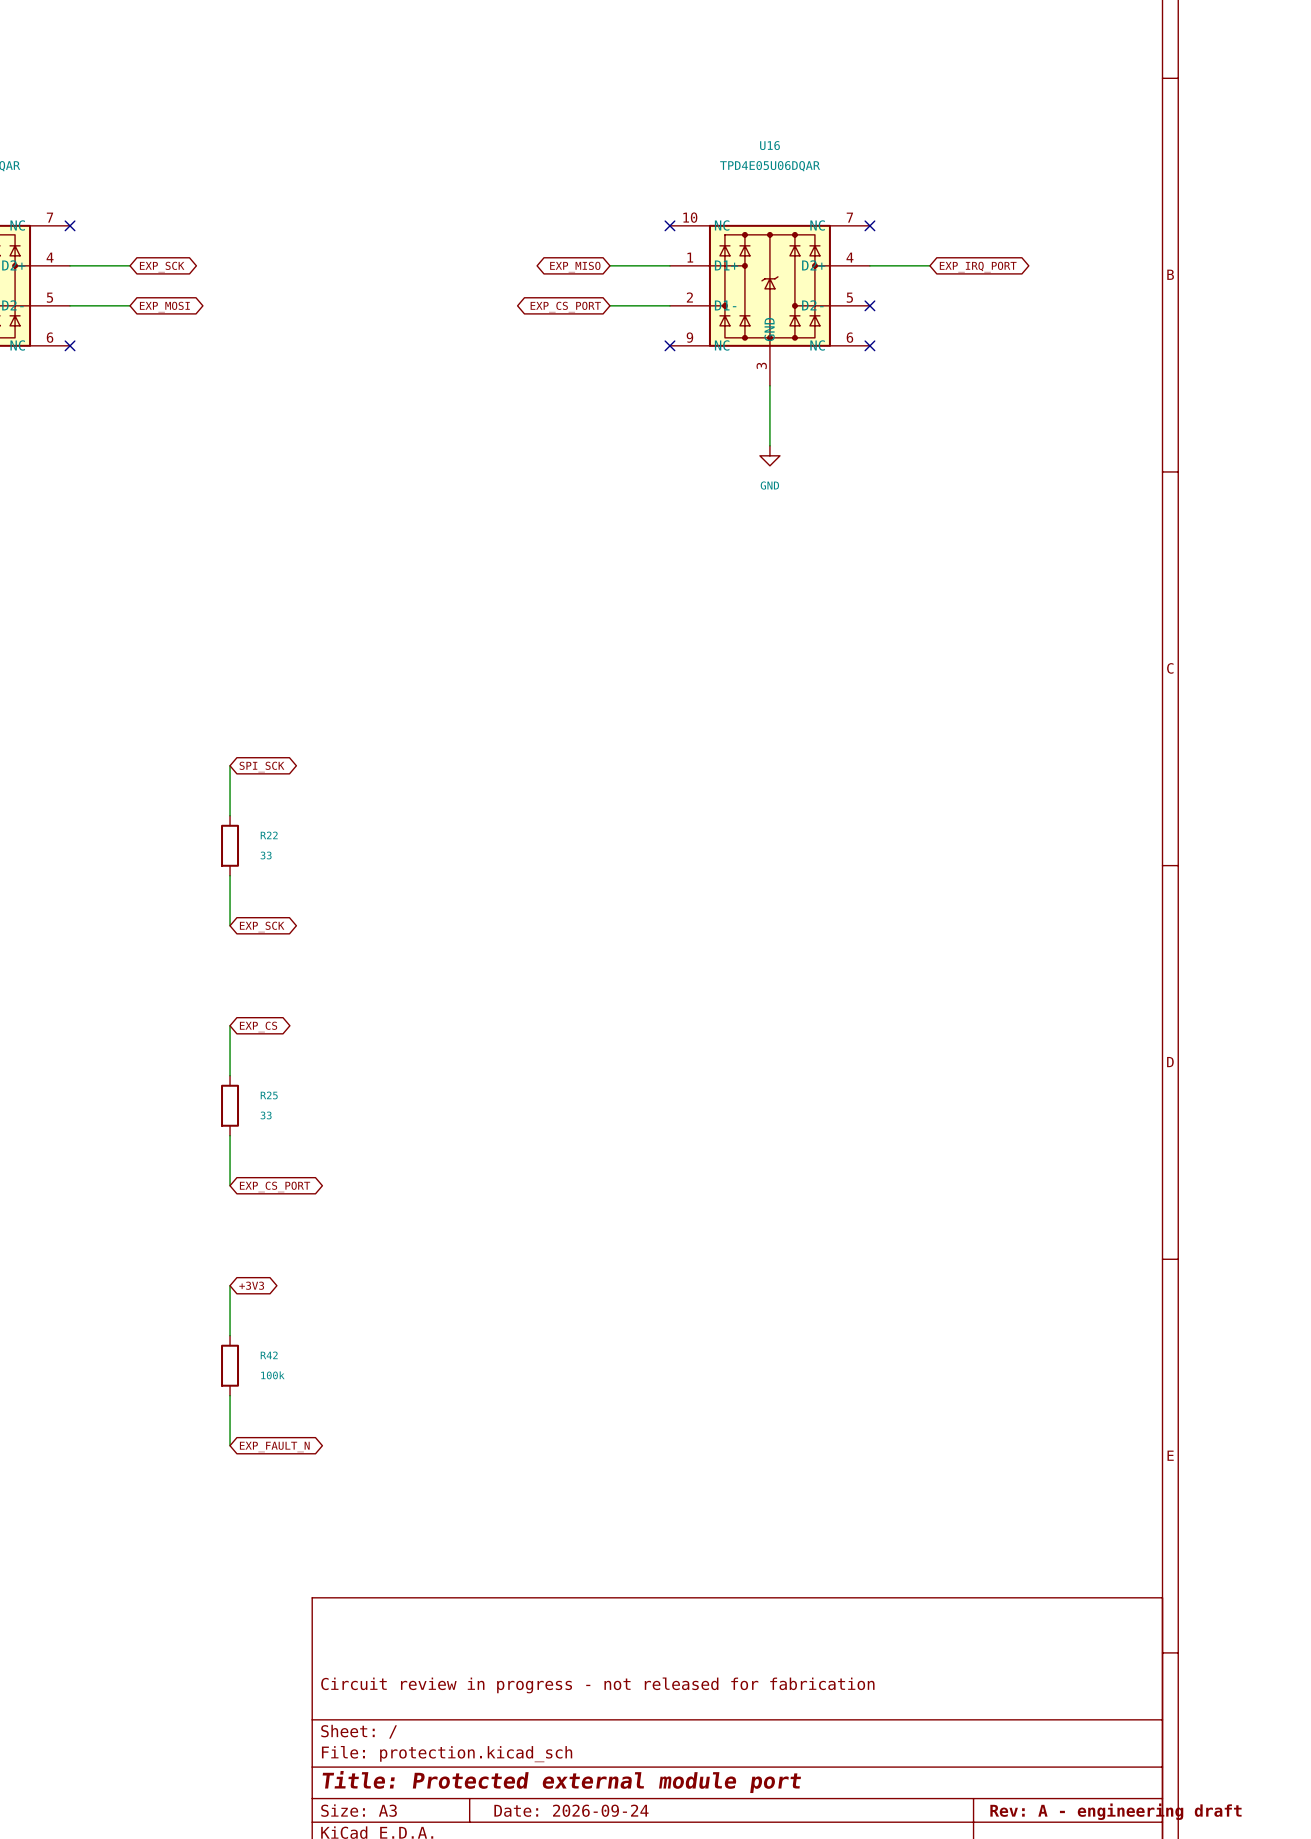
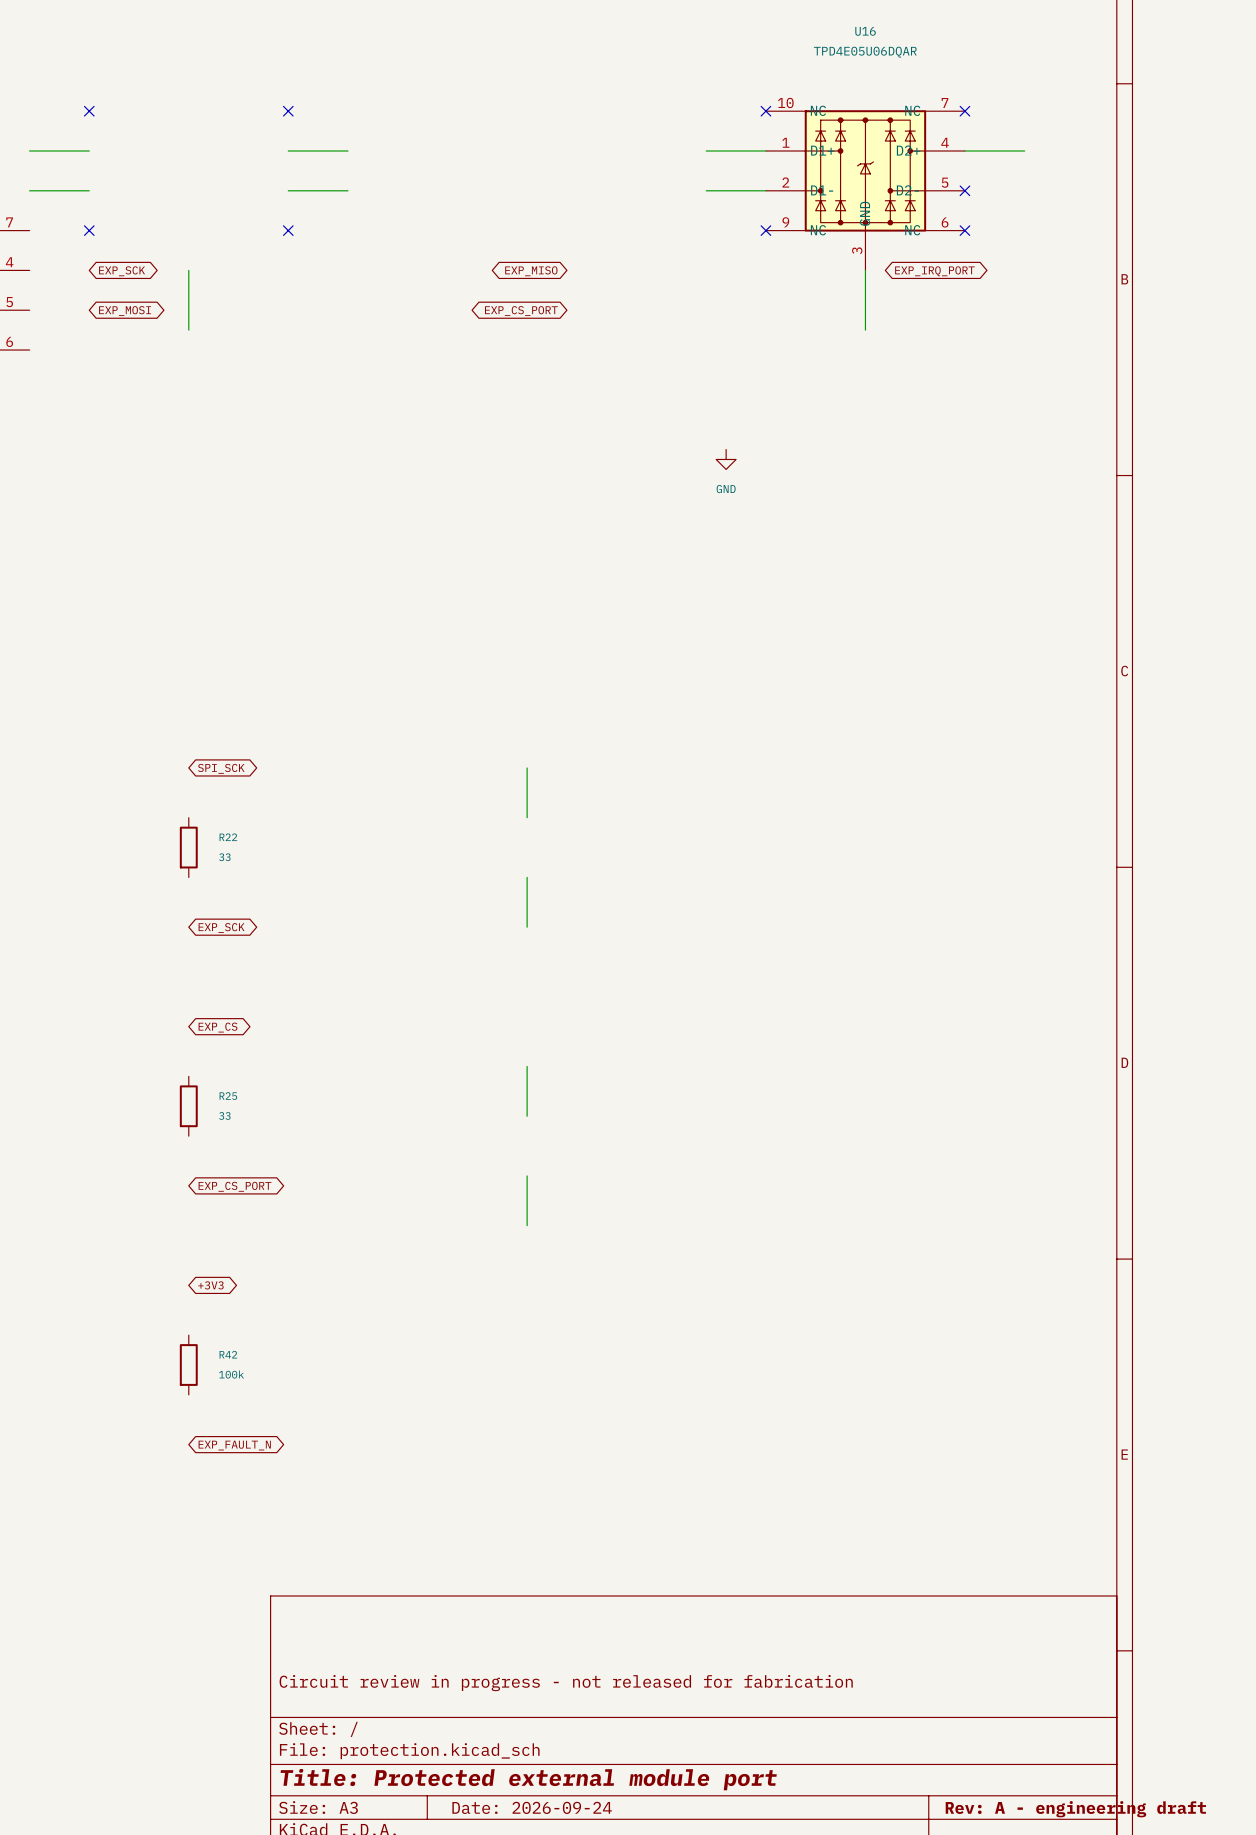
no-connect mark: none -> (89, 111)
no-connect mark: none -> (288, 111)
no-connect mark: none -> (765, 111)
no-connect mark: none -> (964, 111)
wire: none -> (288, 151) (348, 151)
wire: none -> (288, 190) (348, 190)
no-connect mark: none -> (964, 190)
no-connect mark: (70, 225) -> none
no-connect mark: none -> (89, 230)
no-connect mark: none -> (288, 230)
no-connect mark: (669, 225) -> none
no-connect mark: none -> (765, 230)
no-connect mark: (869, 225) -> none
no-connect mark: none -> (964, 230)
wire: (70, 265) (130, 265) -> (29, 151) (89, 151)
wire: none -> (188, 270) (188, 330)
wire: (609, 265) (669, 265) -> (706, 151) (765, 151)
wire: (869, 265) (929, 265) -> (964, 151) (1024, 151)
wire: (70, 305) (130, 305) -> (29, 190) (89, 190)
wire: (609, 305) (669, 305) -> (706, 190) (765, 190)
U16 position: (769, 305) -> (865, 190)
no-connect mark: (869, 305) -> none
no-connect mark: (70, 345) -> none
no-connect mark: (669, 345) -> none
no-connect mark: (869, 345) -> none
wire: (769, 385) (769, 445) -> (865, 270) (865, 330)
wire: (230, 765) (230, 815) -> none
wire: none -> (527, 767) (527, 817)
wire: (230, 875) (230, 925) -> none
wire: none -> (527, 877) (527, 927)
wire: (230, 1025) (230, 1075) -> none
wire: none -> (527, 1066) (527, 1116)
wire: (230, 1135) (230, 1185) -> none
wire: none -> (527, 1175) (527, 1225)
wire: (230, 1285) (230, 1335) -> none
wire: (230, 1395) (230, 1445) -> none

